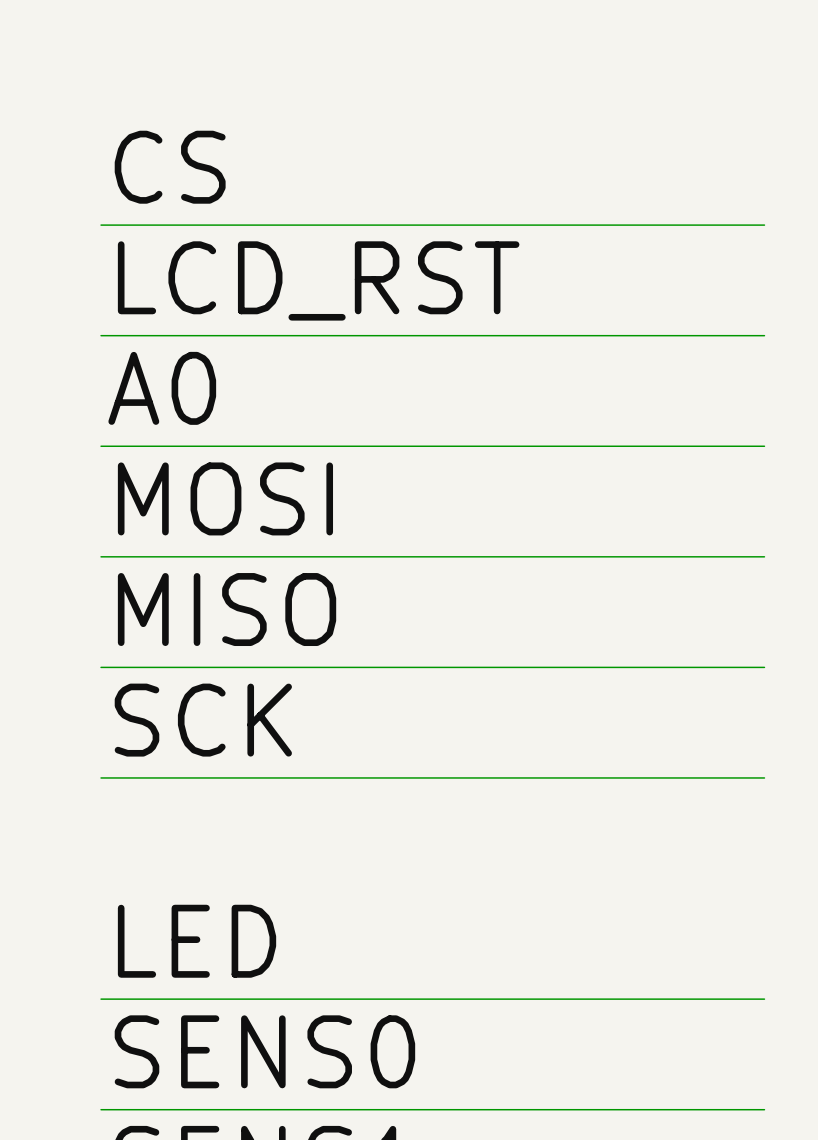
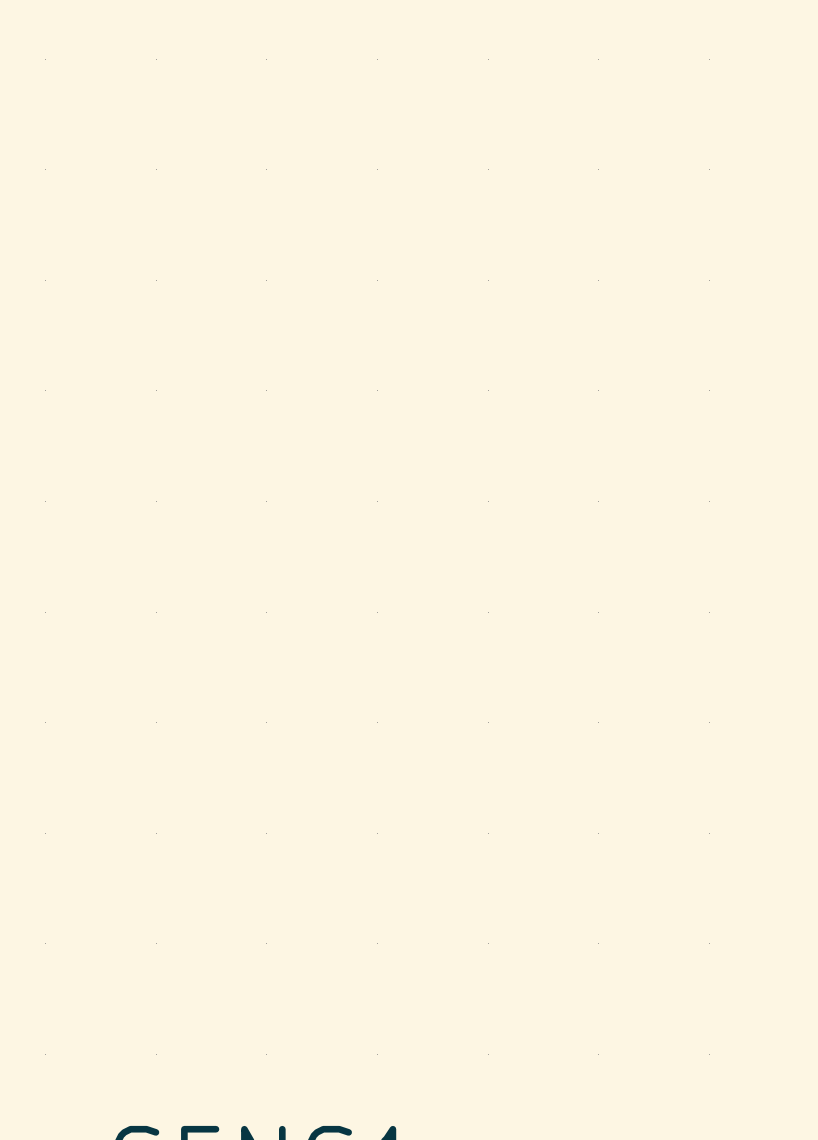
label: CS (170, 167) -> none
wire: (101, 225) (764, 225) -> none
label: LCD_RST (318, 280) -> none
wire: (101, 335) (764, 335) -> none
label: A0 (162, 388) -> none
wire: (101, 446) (764, 446) -> none
label: MOSI (225, 498) -> none
wire: (101, 556) (764, 556) -> none
label: MISO (227, 609) -> none
wire: (101, 667) (764, 667) -> none
label: SCK (203, 720) -> none
wire: (101, 777) (764, 777) -> none
label: LED (197, 941) -> none
wire: (101, 999) (764, 999) -> none
label: SENS0 (264, 1051) -> none
wire: (101, 1109) (764, 1109) -> none

